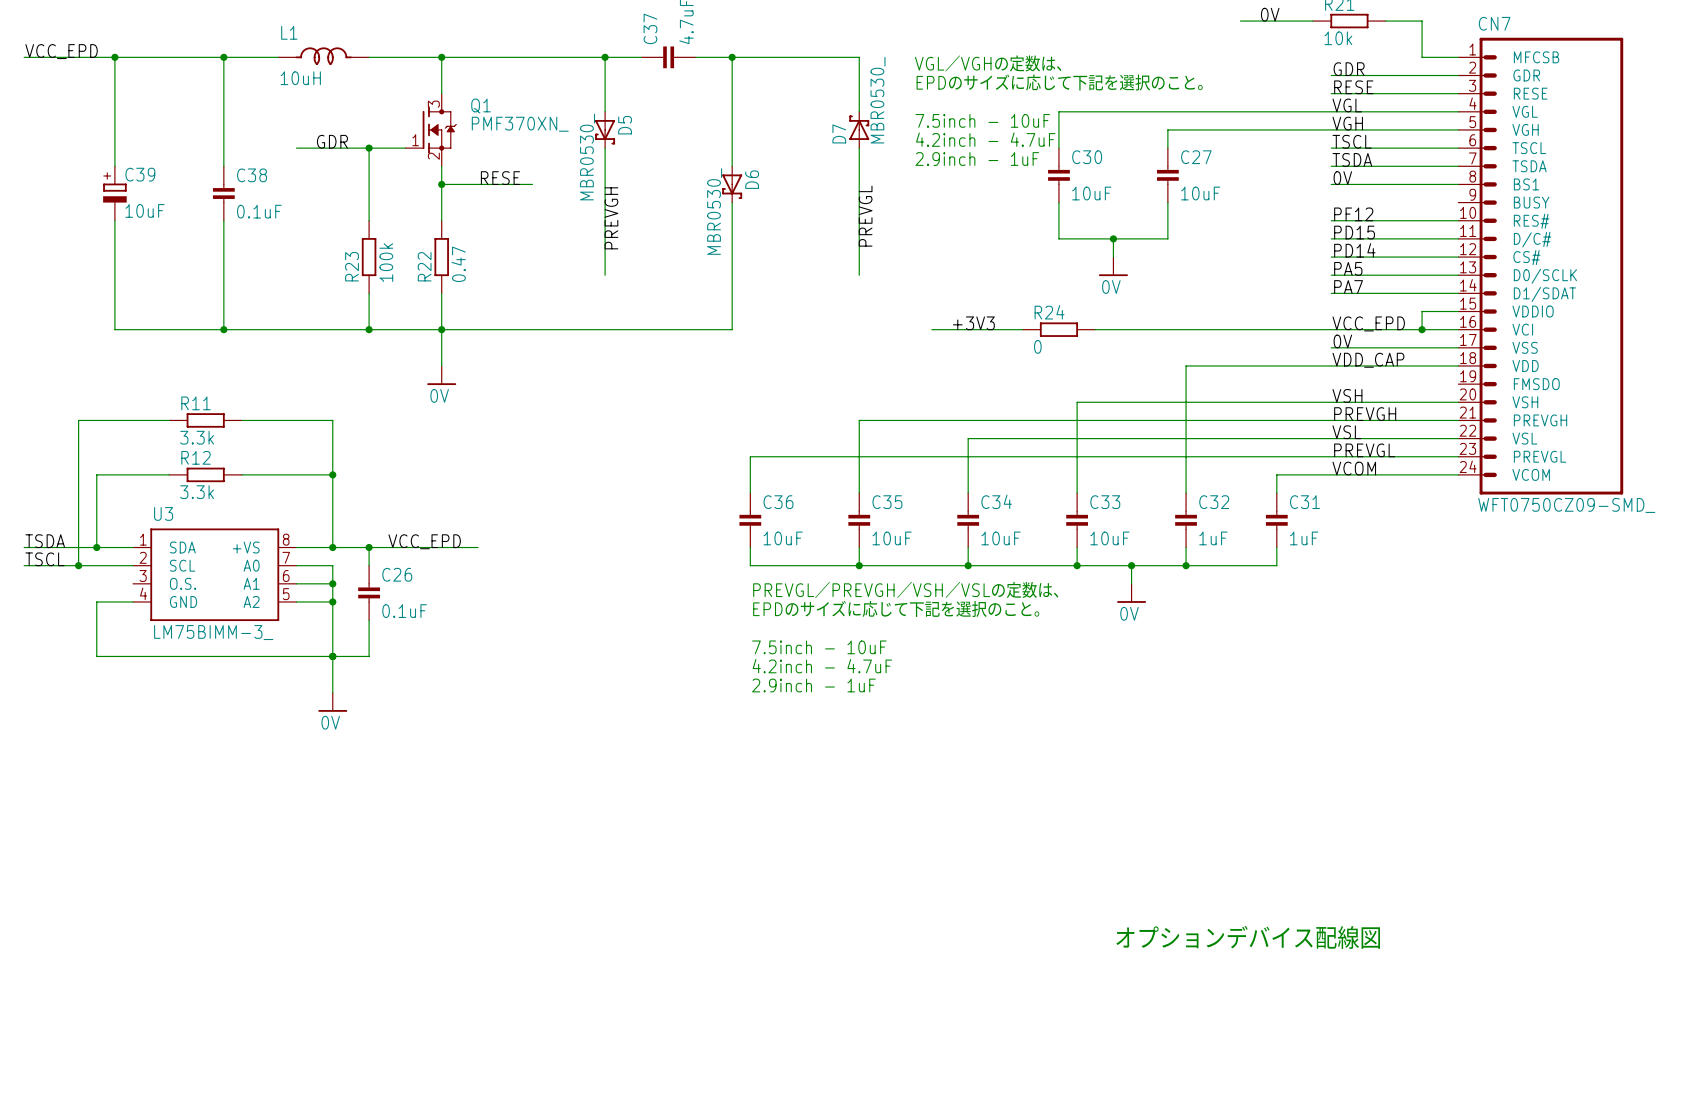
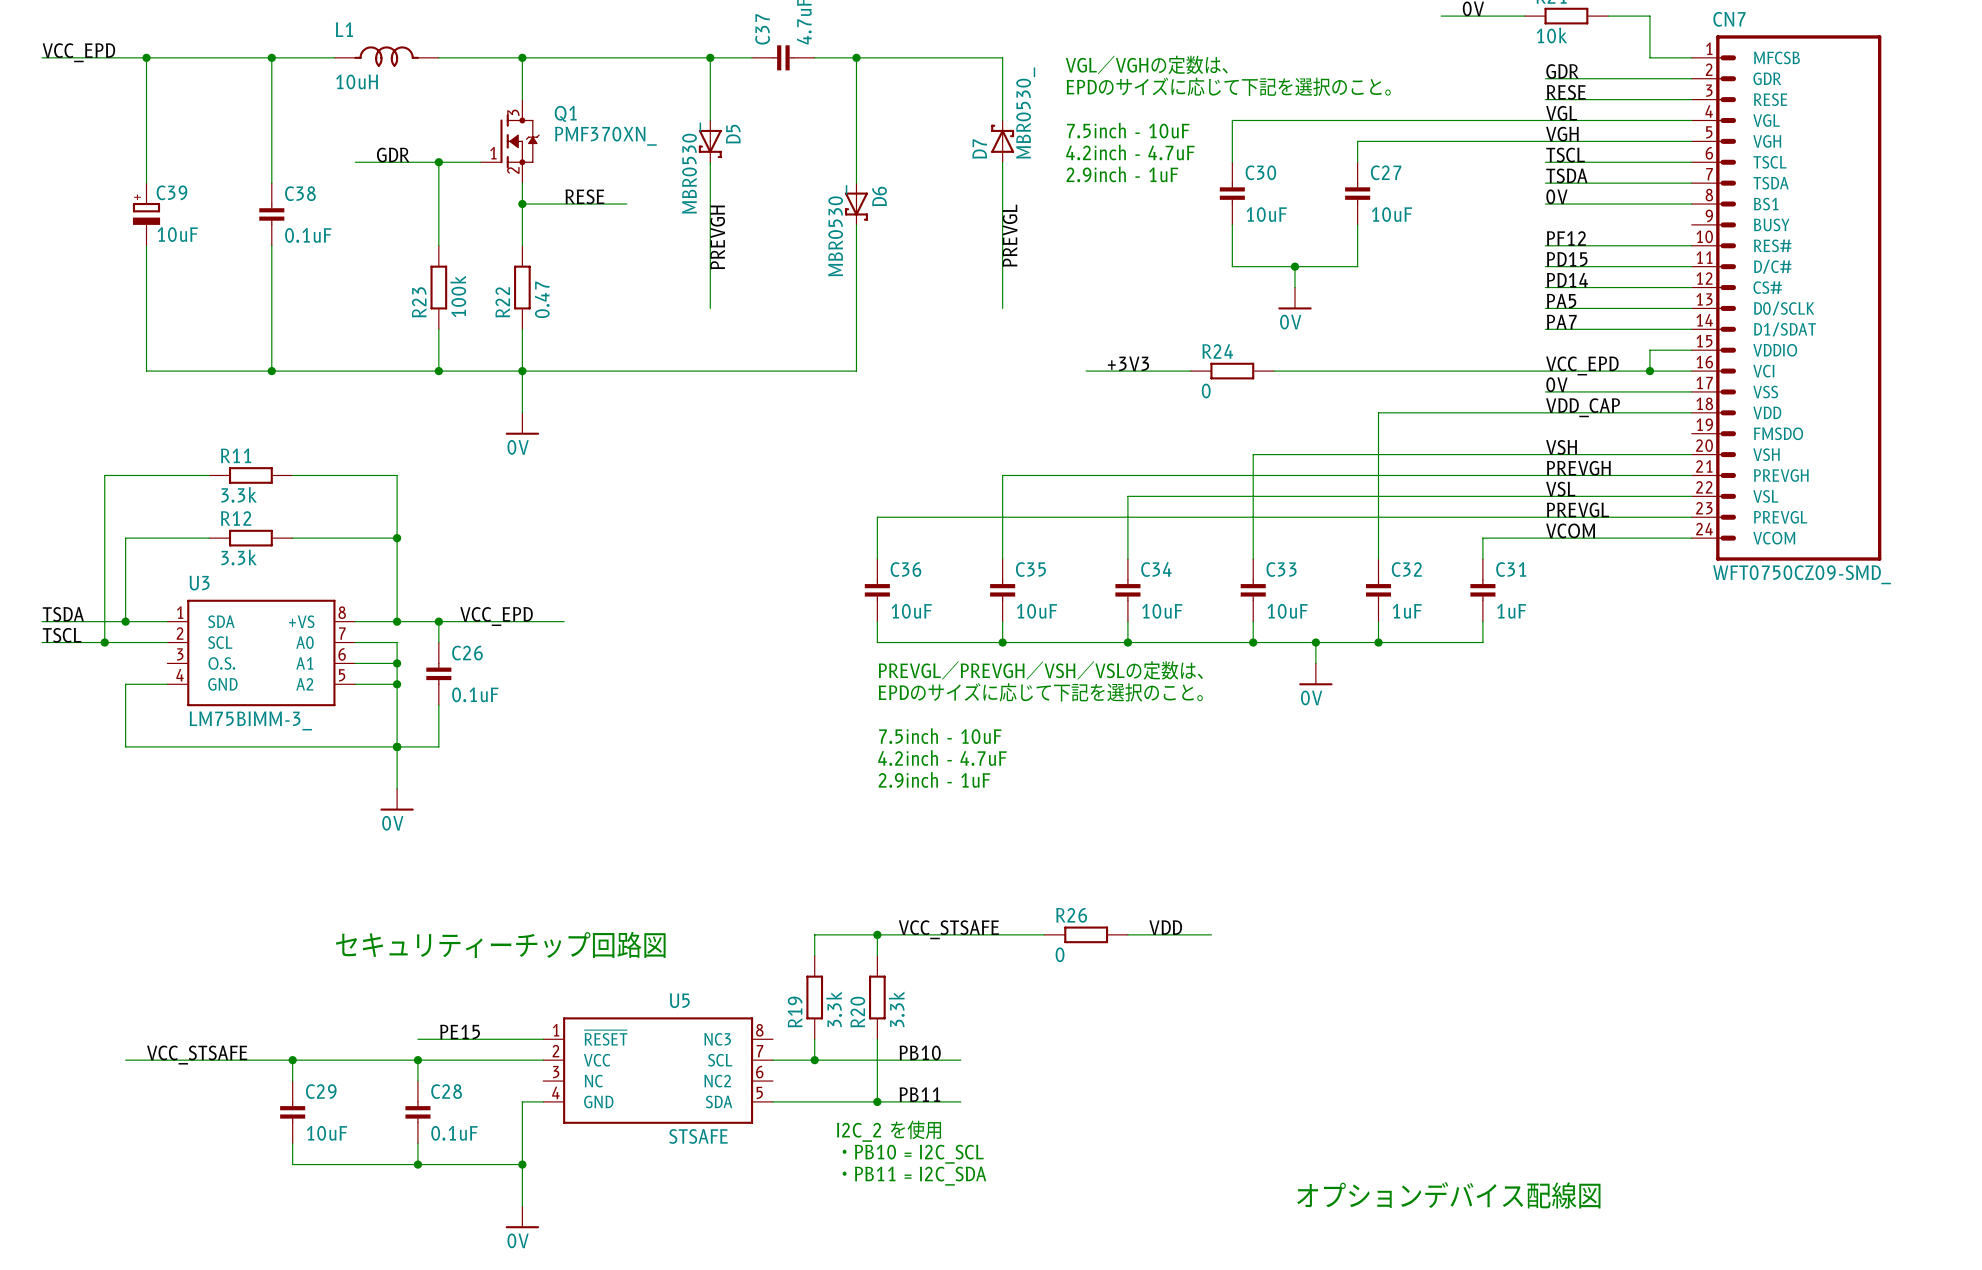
label: none -> VDD (1165, 927)
label: none -> VCC_STSAFE (948, 929)
wire: none -> (877, 934) (877, 955)
junction: none -> (877, 934)
wire: none -> (1044, 934) (814, 934) (814, 955)
R26: none -> 0 (1086, 934)
wire: none -> (1127, 934) (1211, 934)
text: none -> セキュリティーチップ回路図 (500, 944)
R19: none -> 3.3k (814, 997)
R20: none -> 3.3k (877, 997)
label: none -> PE15 (460, 1031)
wire: none -> (417, 1039) (543, 1039)
wire: none -> (814, 1039) (814, 1060)
wire: none -> (877, 1039) (877, 1101)
label: none -> PB10 (920, 1052)
label: none -> VCC_STSAFE (197, 1055)
wire: none -> (125, 1060) (543, 1060)
wire: none -> (292, 1060) (292, 1081)
junction: none -> (292, 1060)
wire: none -> (417, 1060) (417, 1081)
junction: none -> (417, 1060)
wire: none -> (772, 1060) (960, 1060)
junction: none -> (814, 1060)
U5: none -> STSAFE (658, 1070)
text position: オプションデバイス配線図 (1248, 937) -> オプションデバイス配線図 (1448, 1195)
label: none -> PB11 (919, 1094)
wire: none -> (543, 1101) (522, 1101) (522, 1206)
wire: none -> (772, 1101) (960, 1101)
junction: none -> (877, 1101)
C29: none -> 10uF (292, 1112)
C28: none -> 0.1uF (417, 1112)
text: none -> I2C_2 を使用 (889, 1131)
wire: none -> (292, 1143) (292, 1164) (522, 1164)
wire: none -> (417, 1143) (417, 1164)
text: none -> ・PB10 = I2C_SCL (913, 1154)
junction: none -> (417, 1164)
junction: none -> (522, 1164)
text: none -> ・PB11 = I2C_SDA (914, 1176)
power symbol: none -> 0V (522, 1217)

